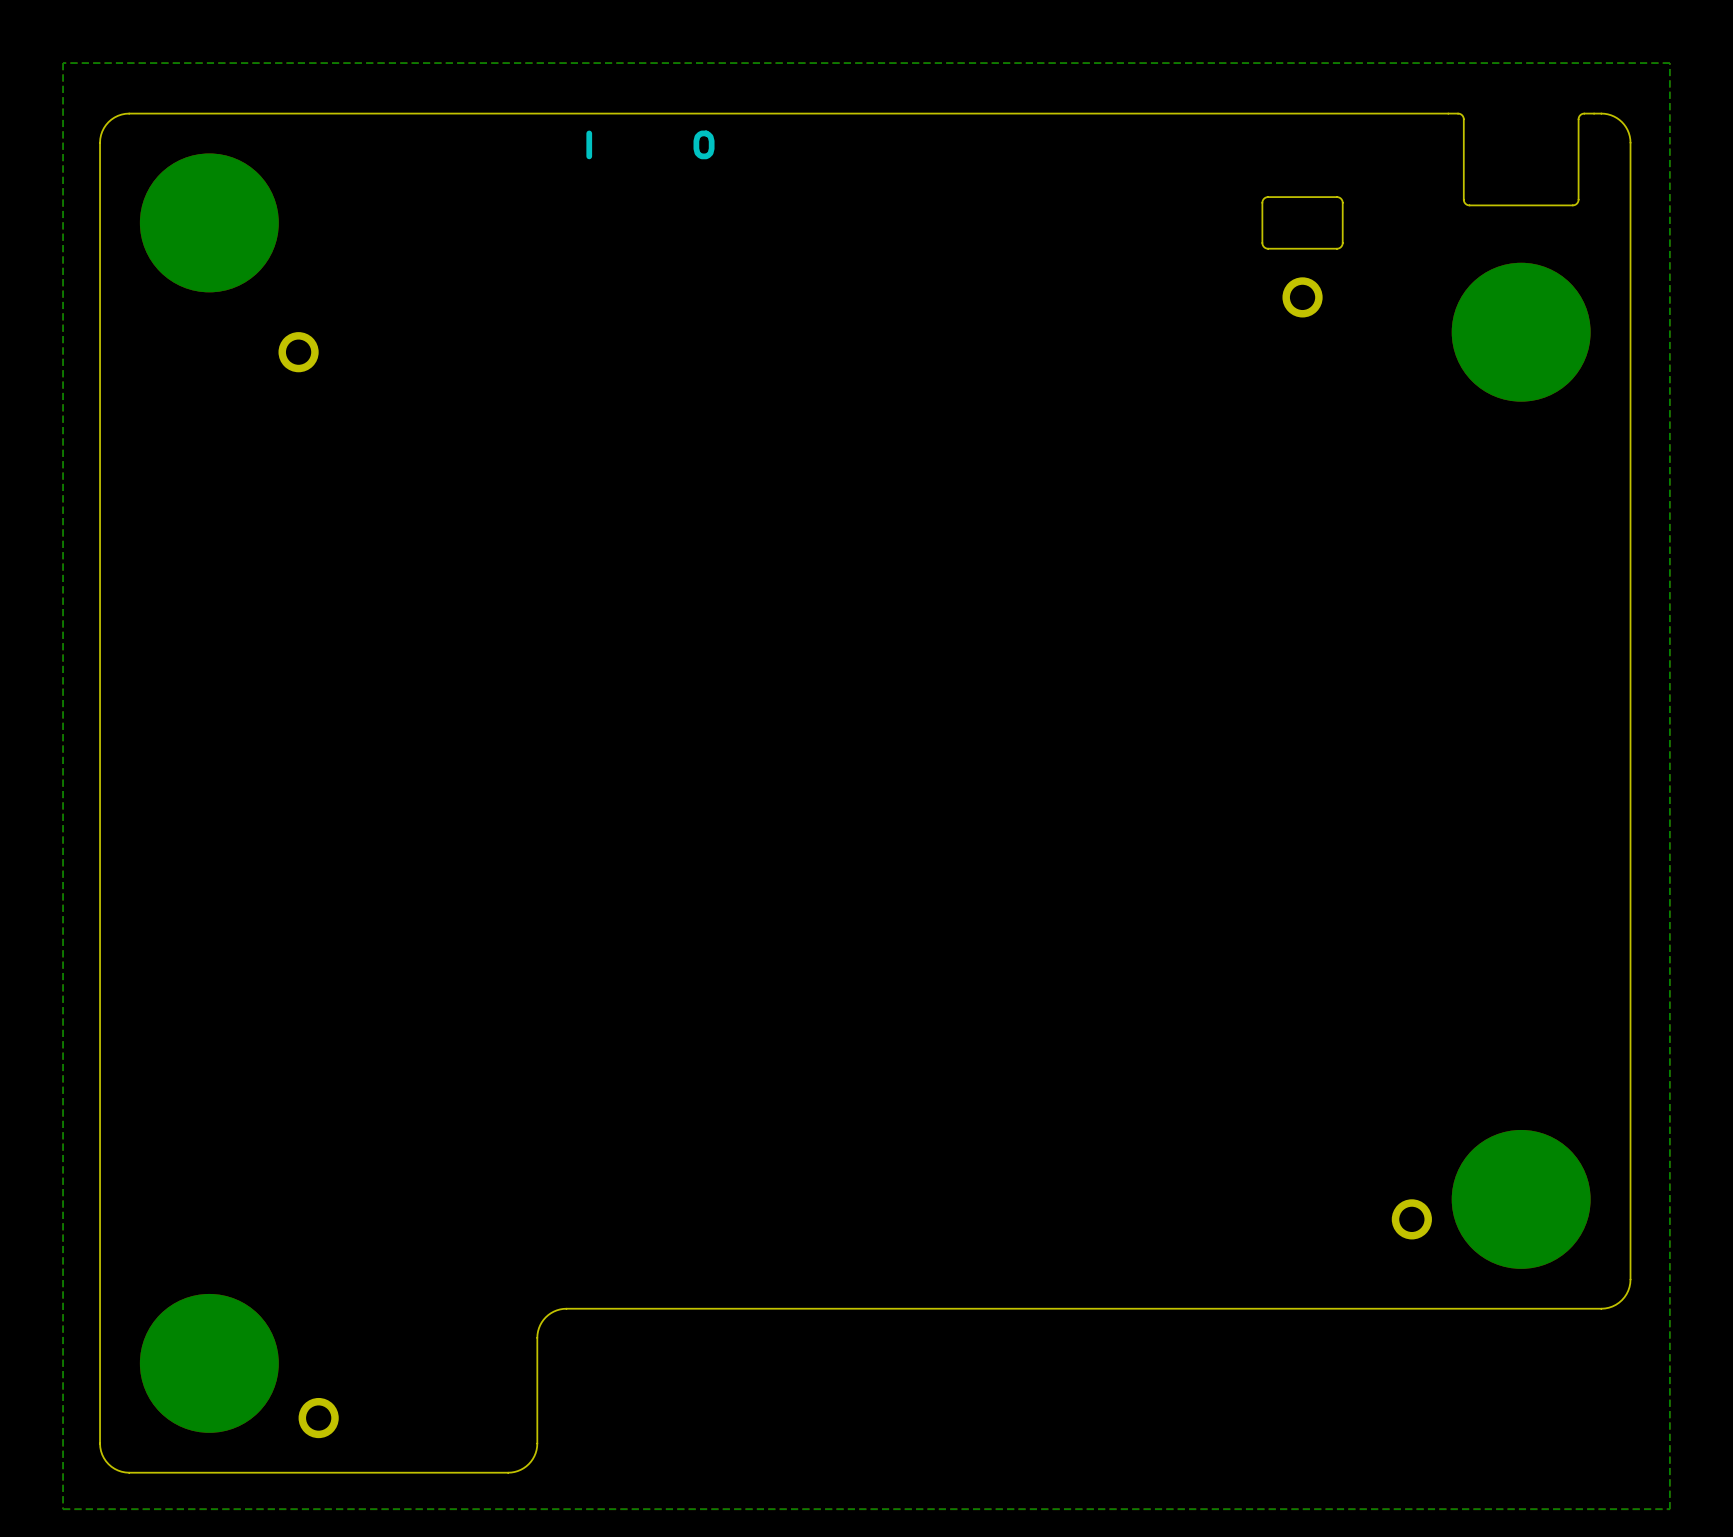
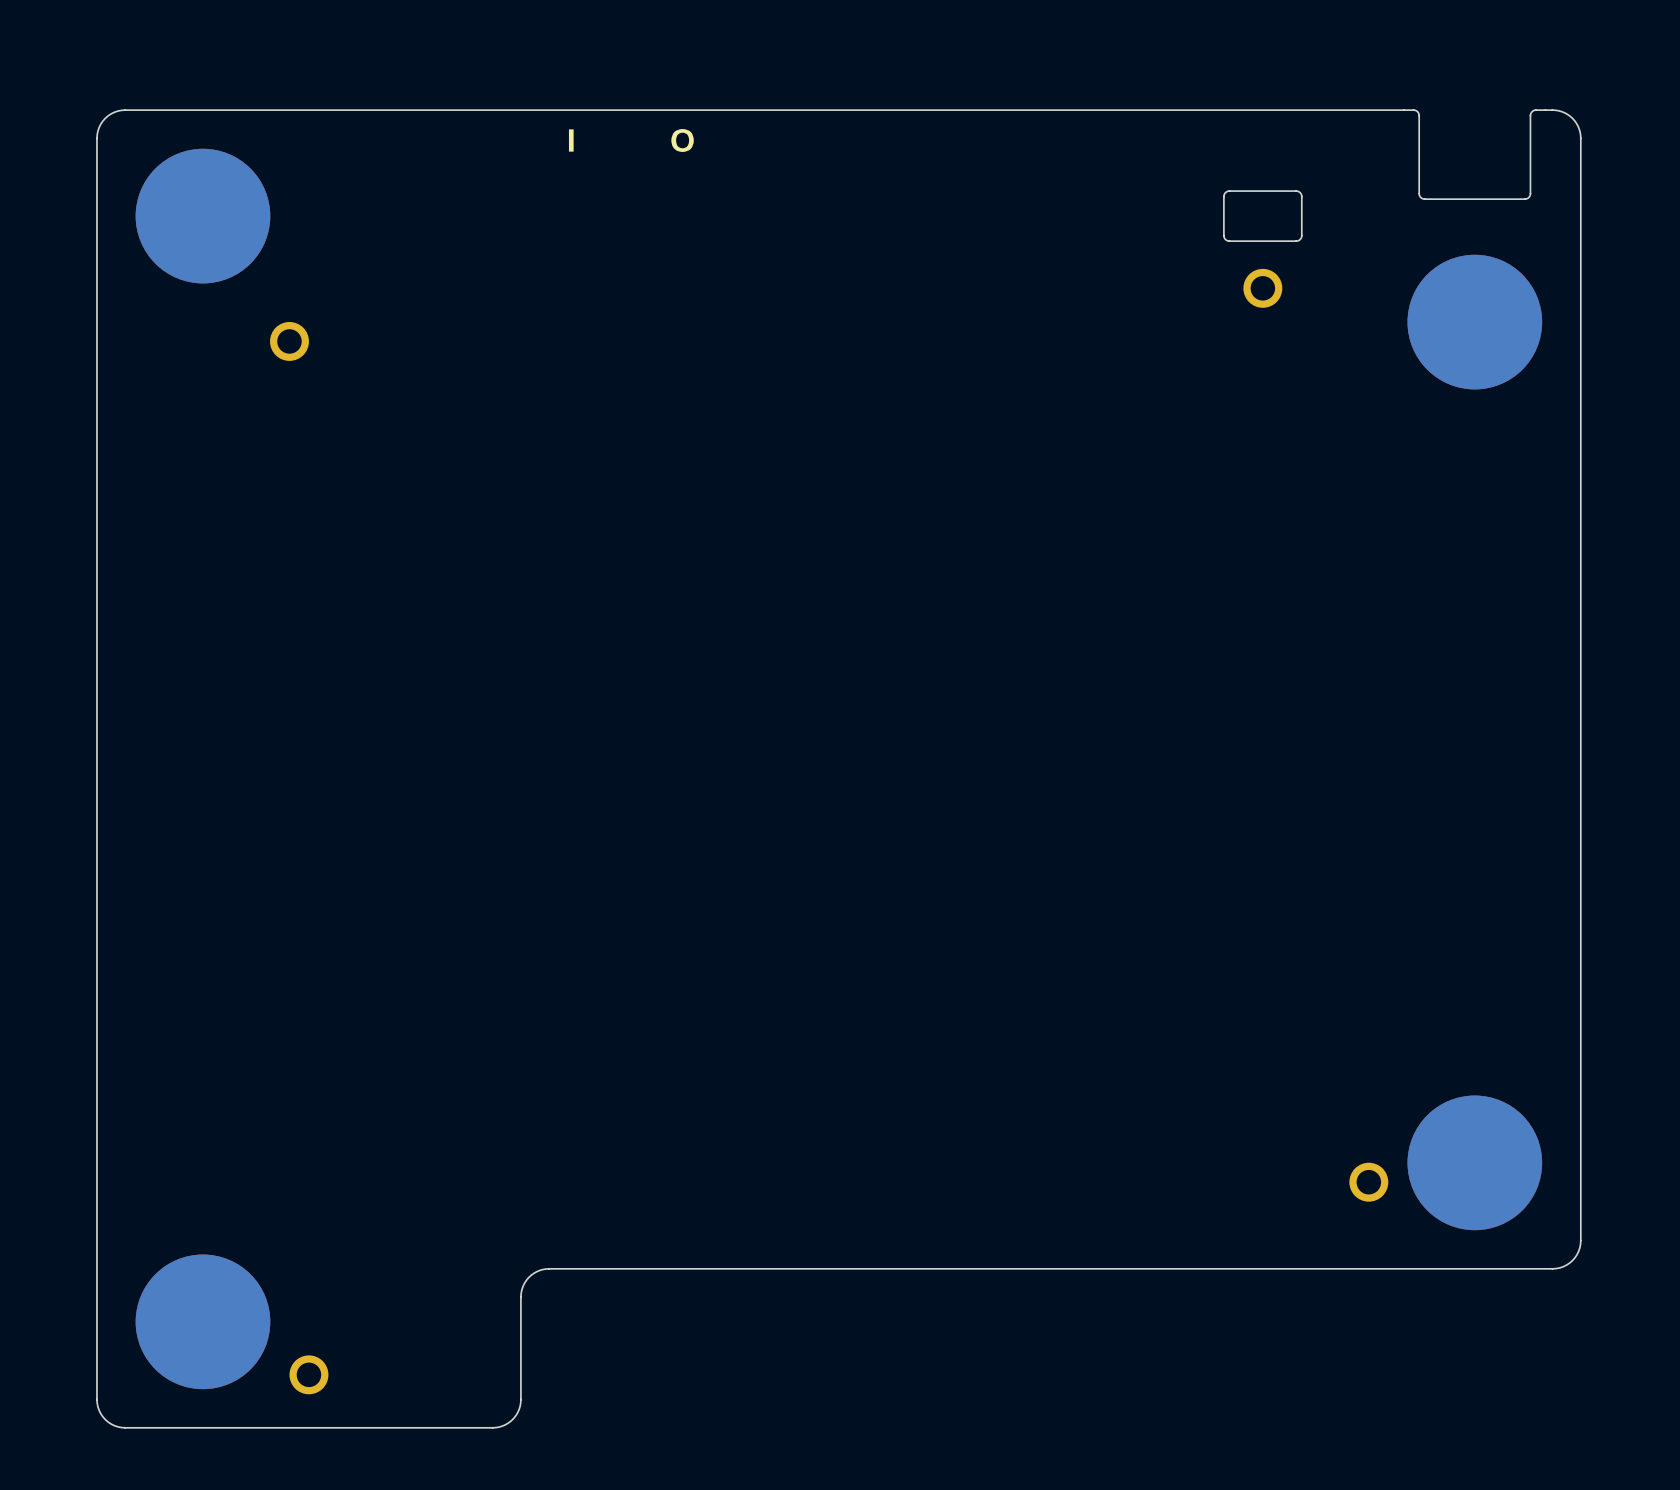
bottom zone outline: (1669, 63) (63, 63) (63, 1509) (1669, 1509) (1669, 63) -> none

